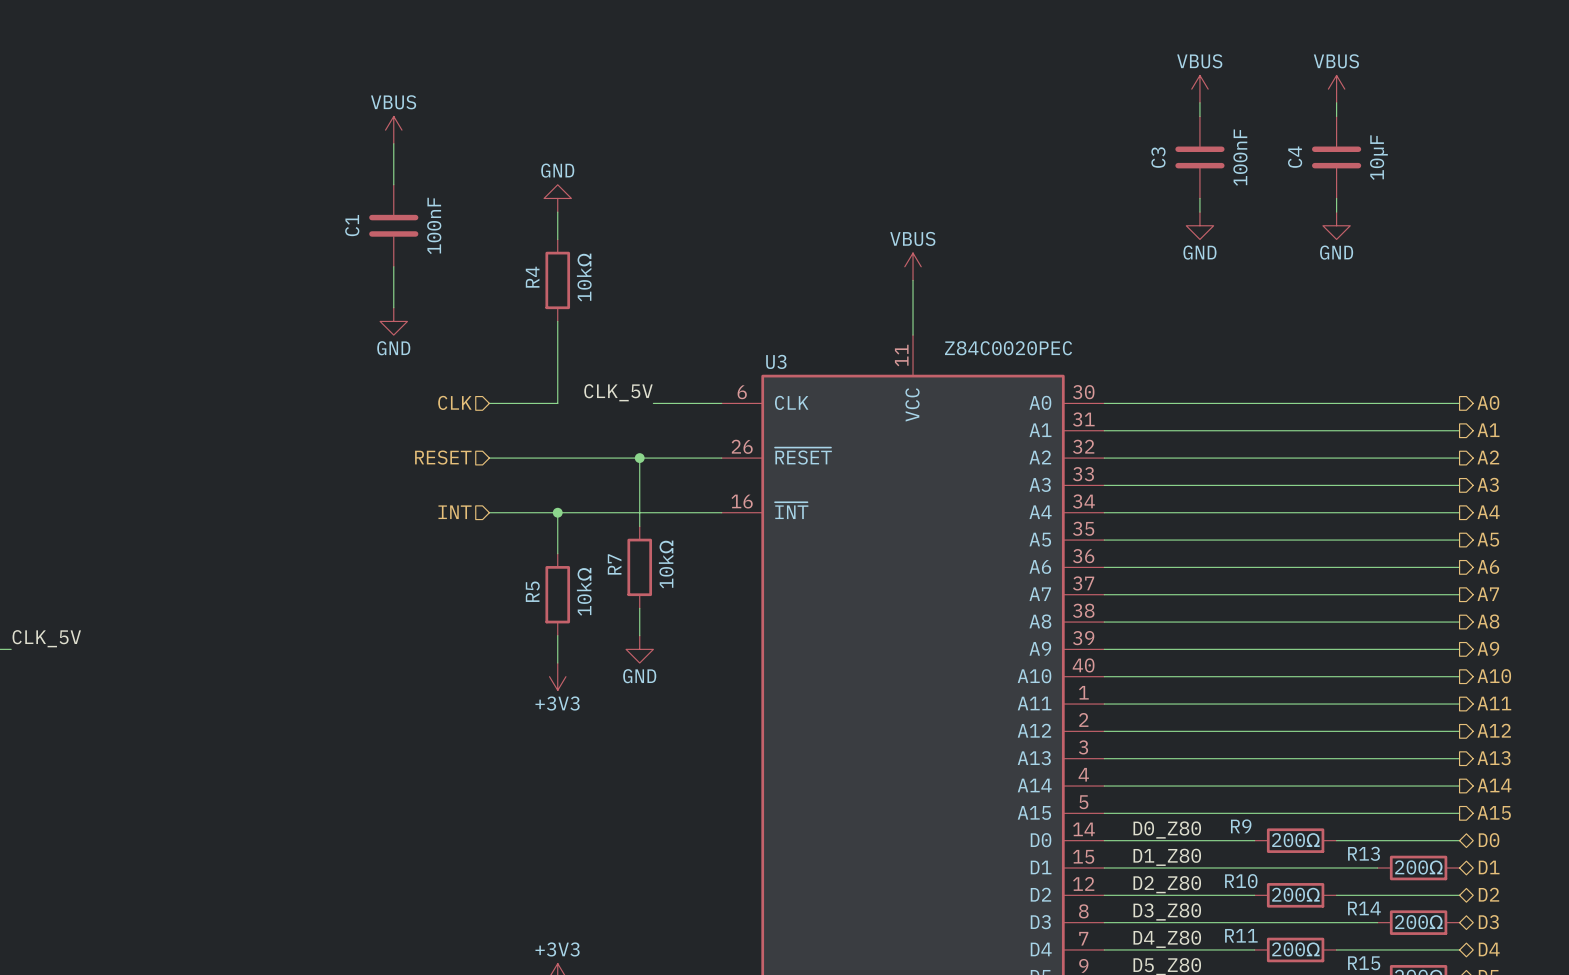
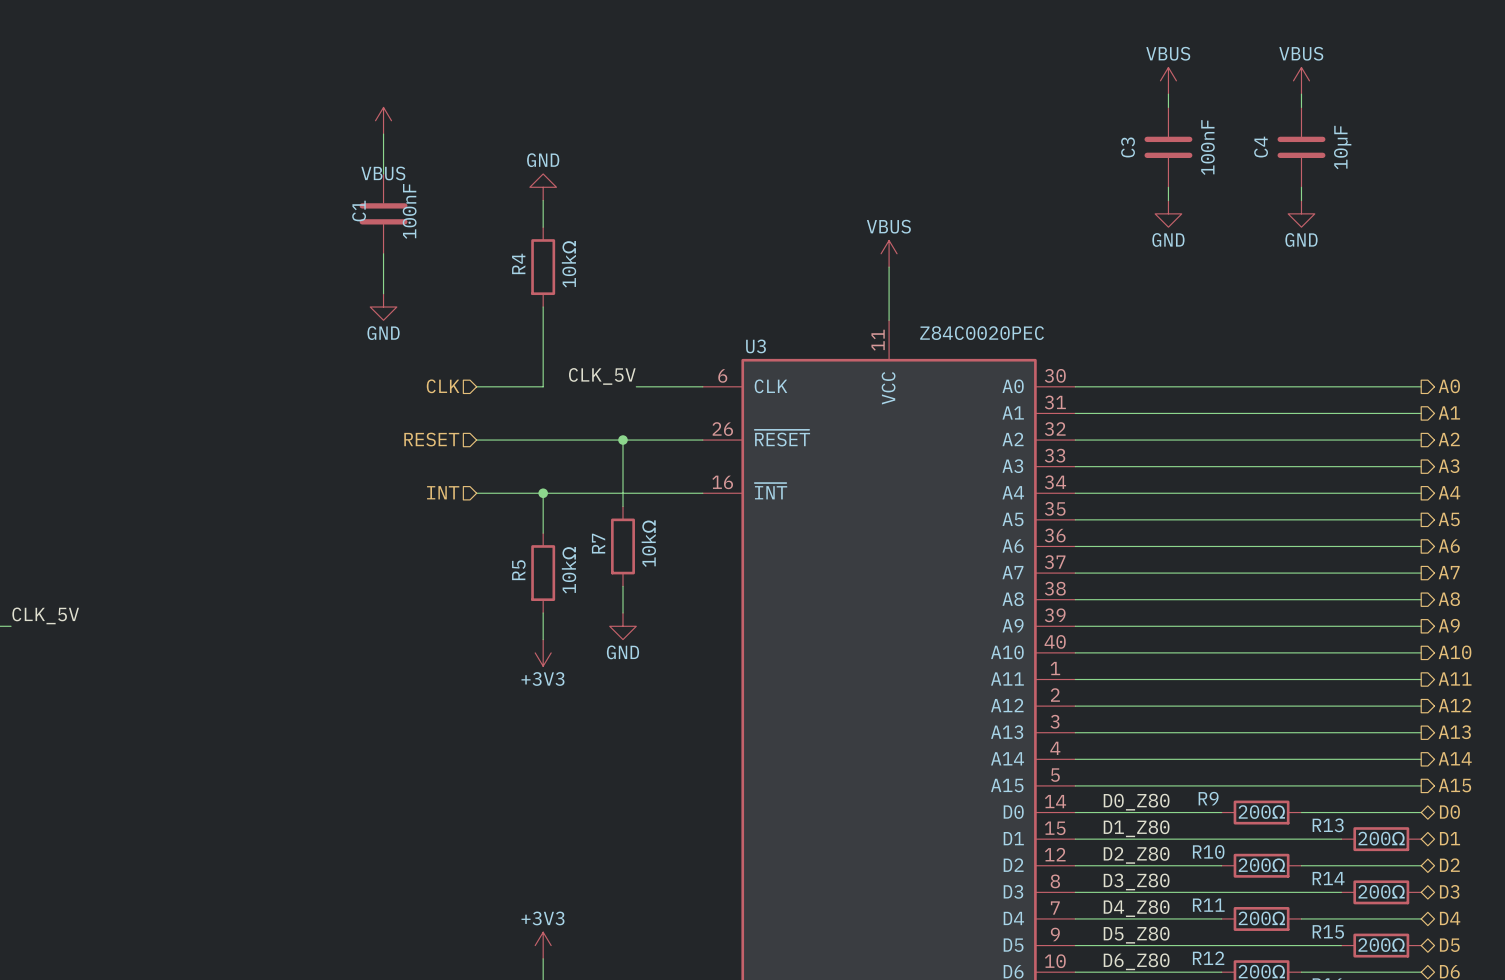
power symbol text position: VBUS (393, 102) -> VBUS (383, 173)
C1 name position: C1 (352, 225) -> C1 (359, 211)
C1 value position: 100nF (434, 225) -> 100nF (409, 211)

